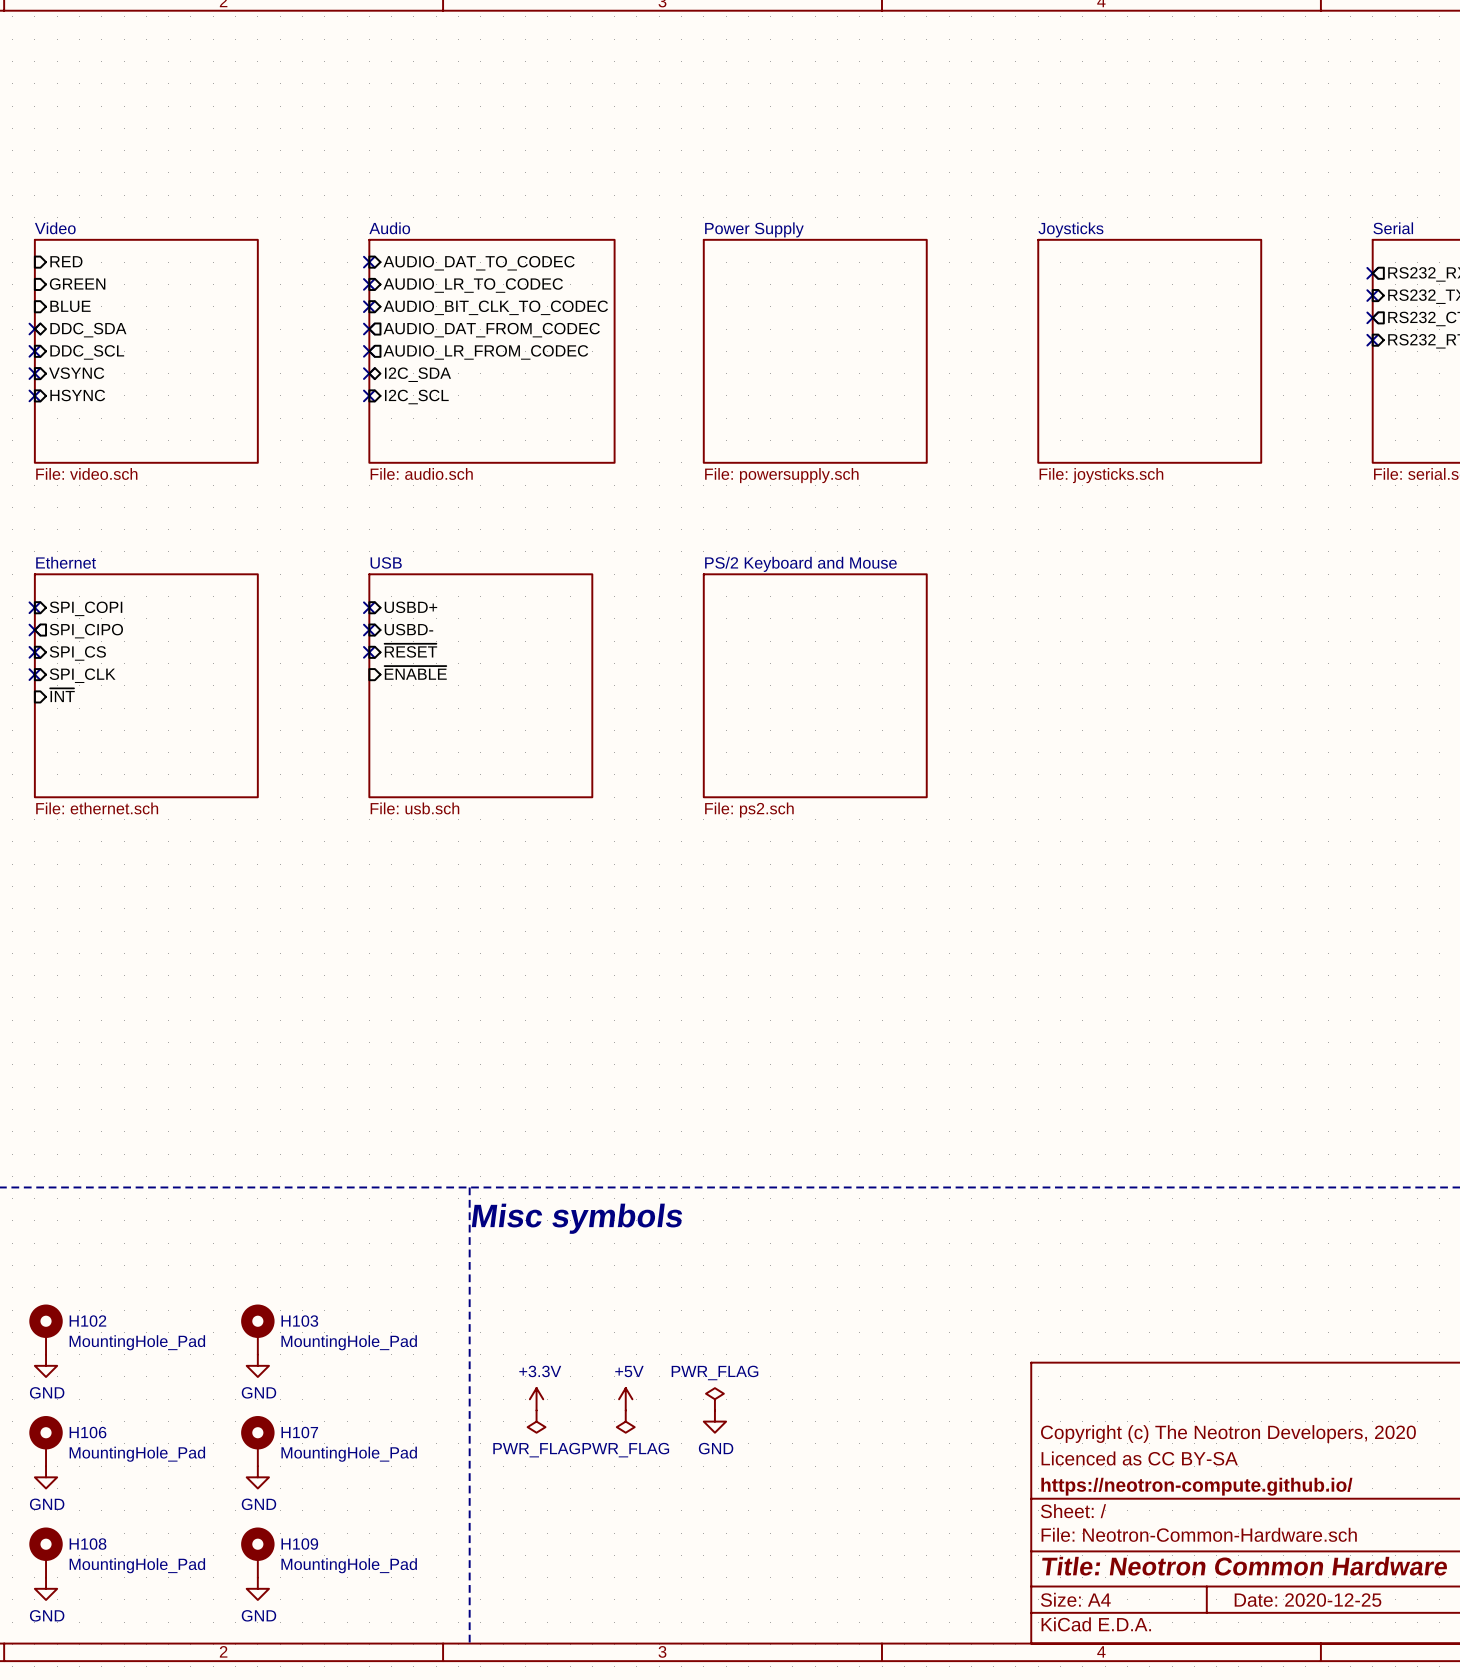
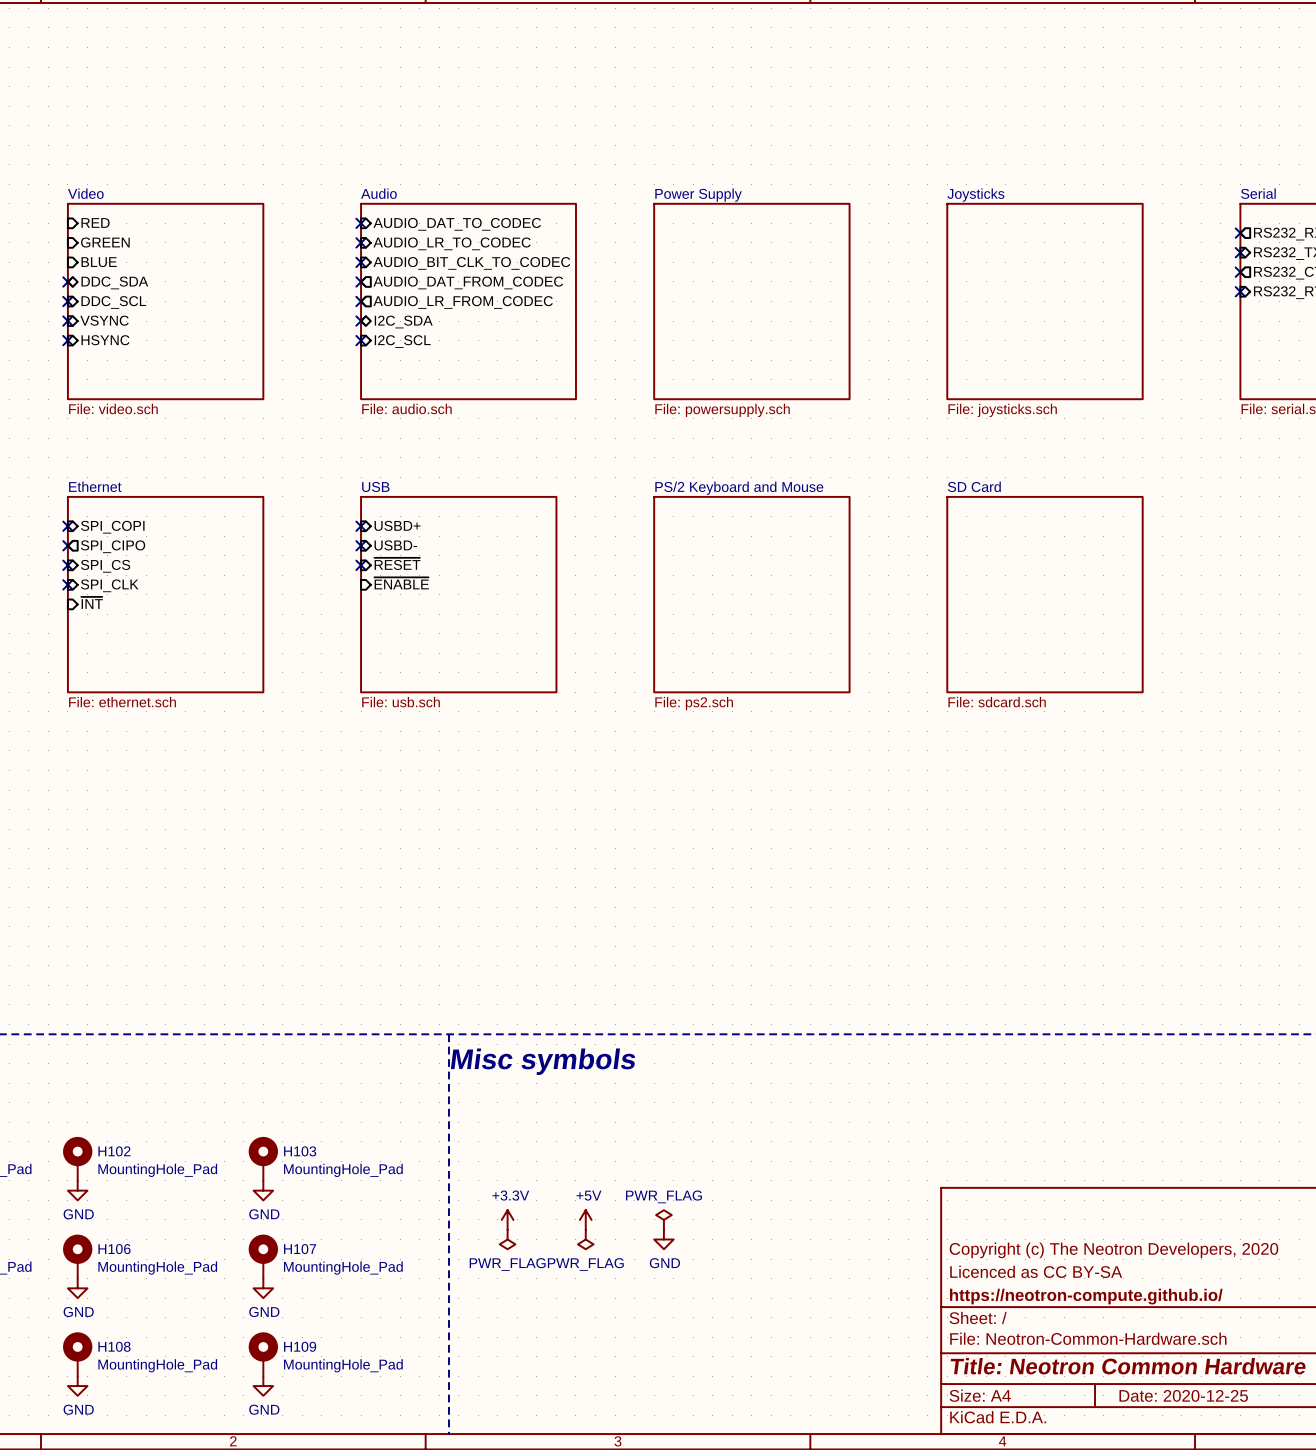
sheet SD Card: none -> File: sdcard.sch (1044, 594)

